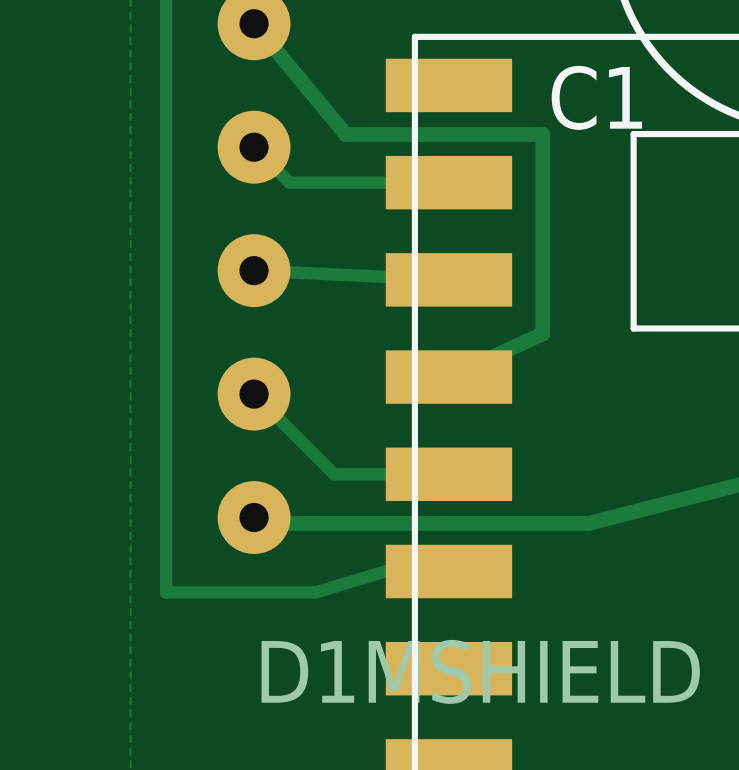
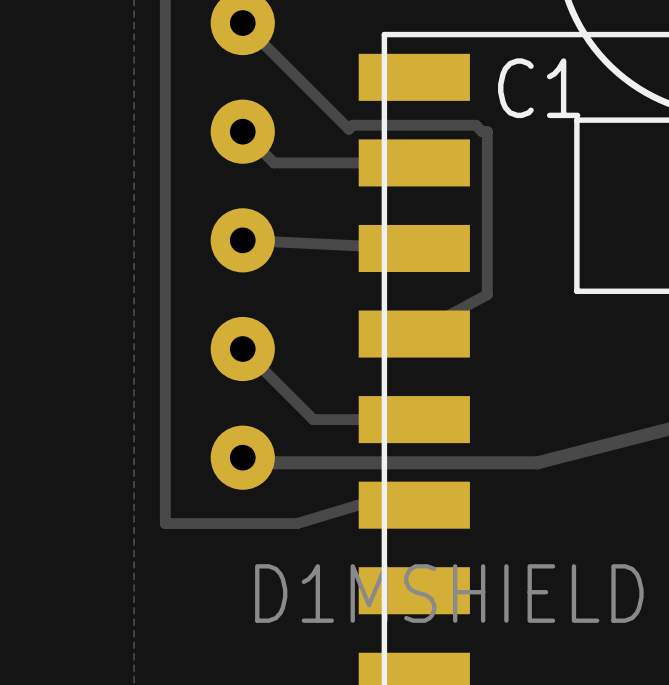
track: (254, 23) (345, 134) (542, 134) (542, 333) (448, 377) -> (242, 23) (348, 129) (352, 125) (475, 125) (482, 131) (487, 131) (487, 294) (414, 334)

